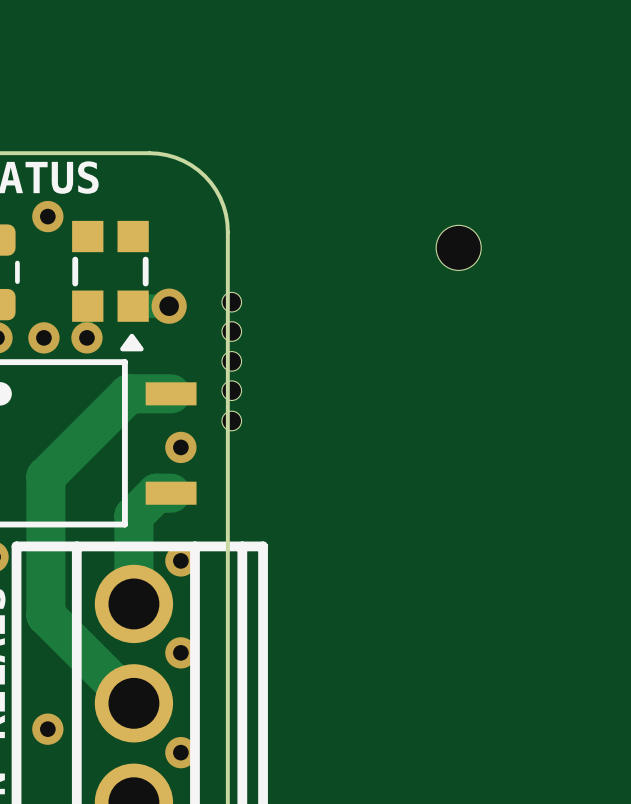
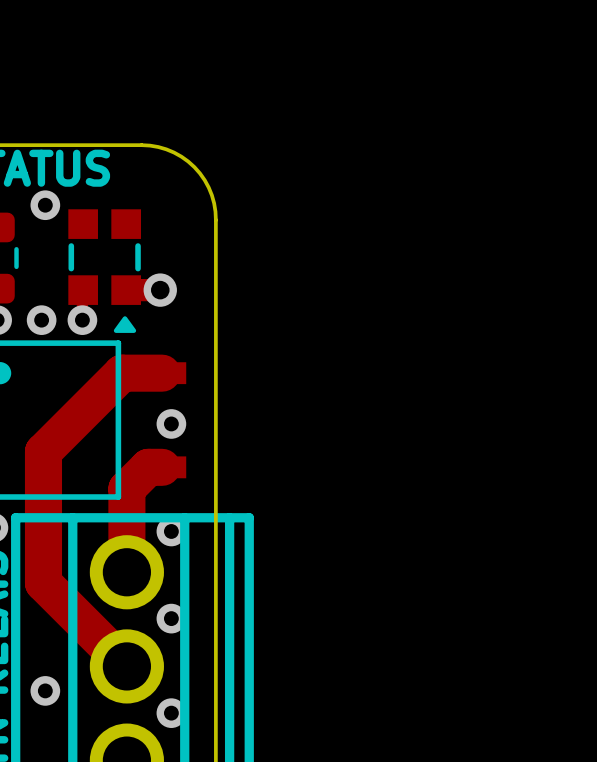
part: (458, 247) -> none
part: (231, 361) -> none

